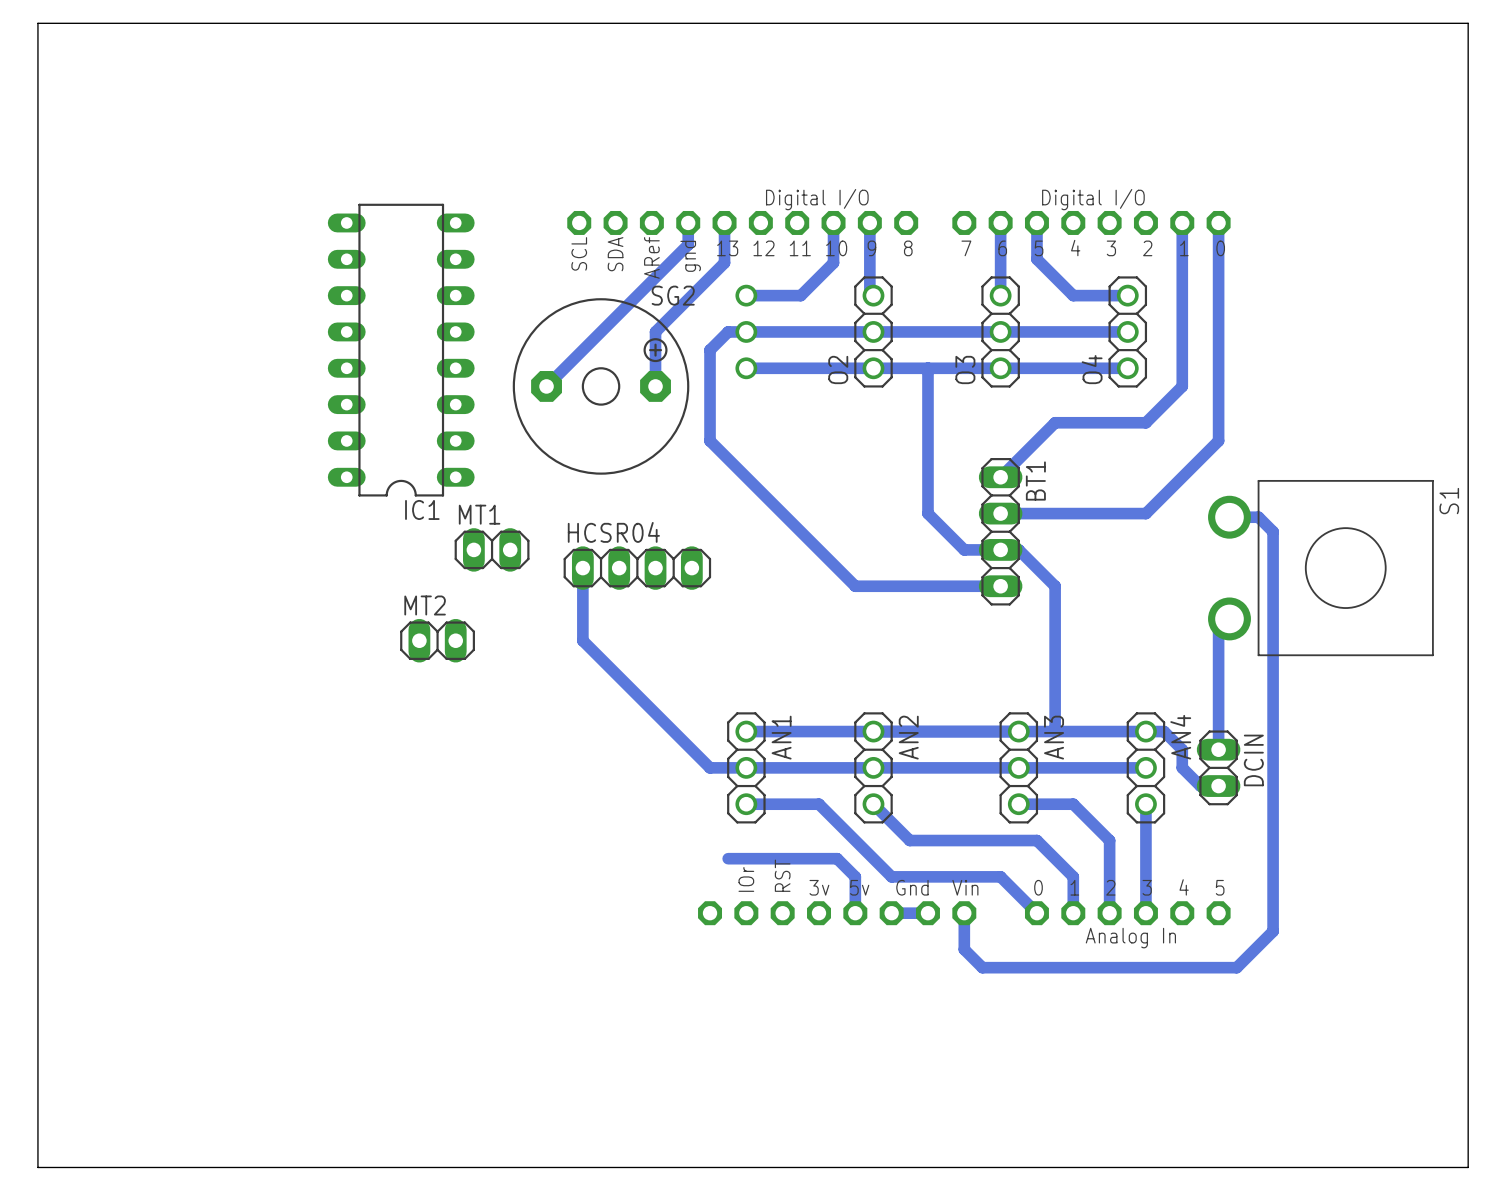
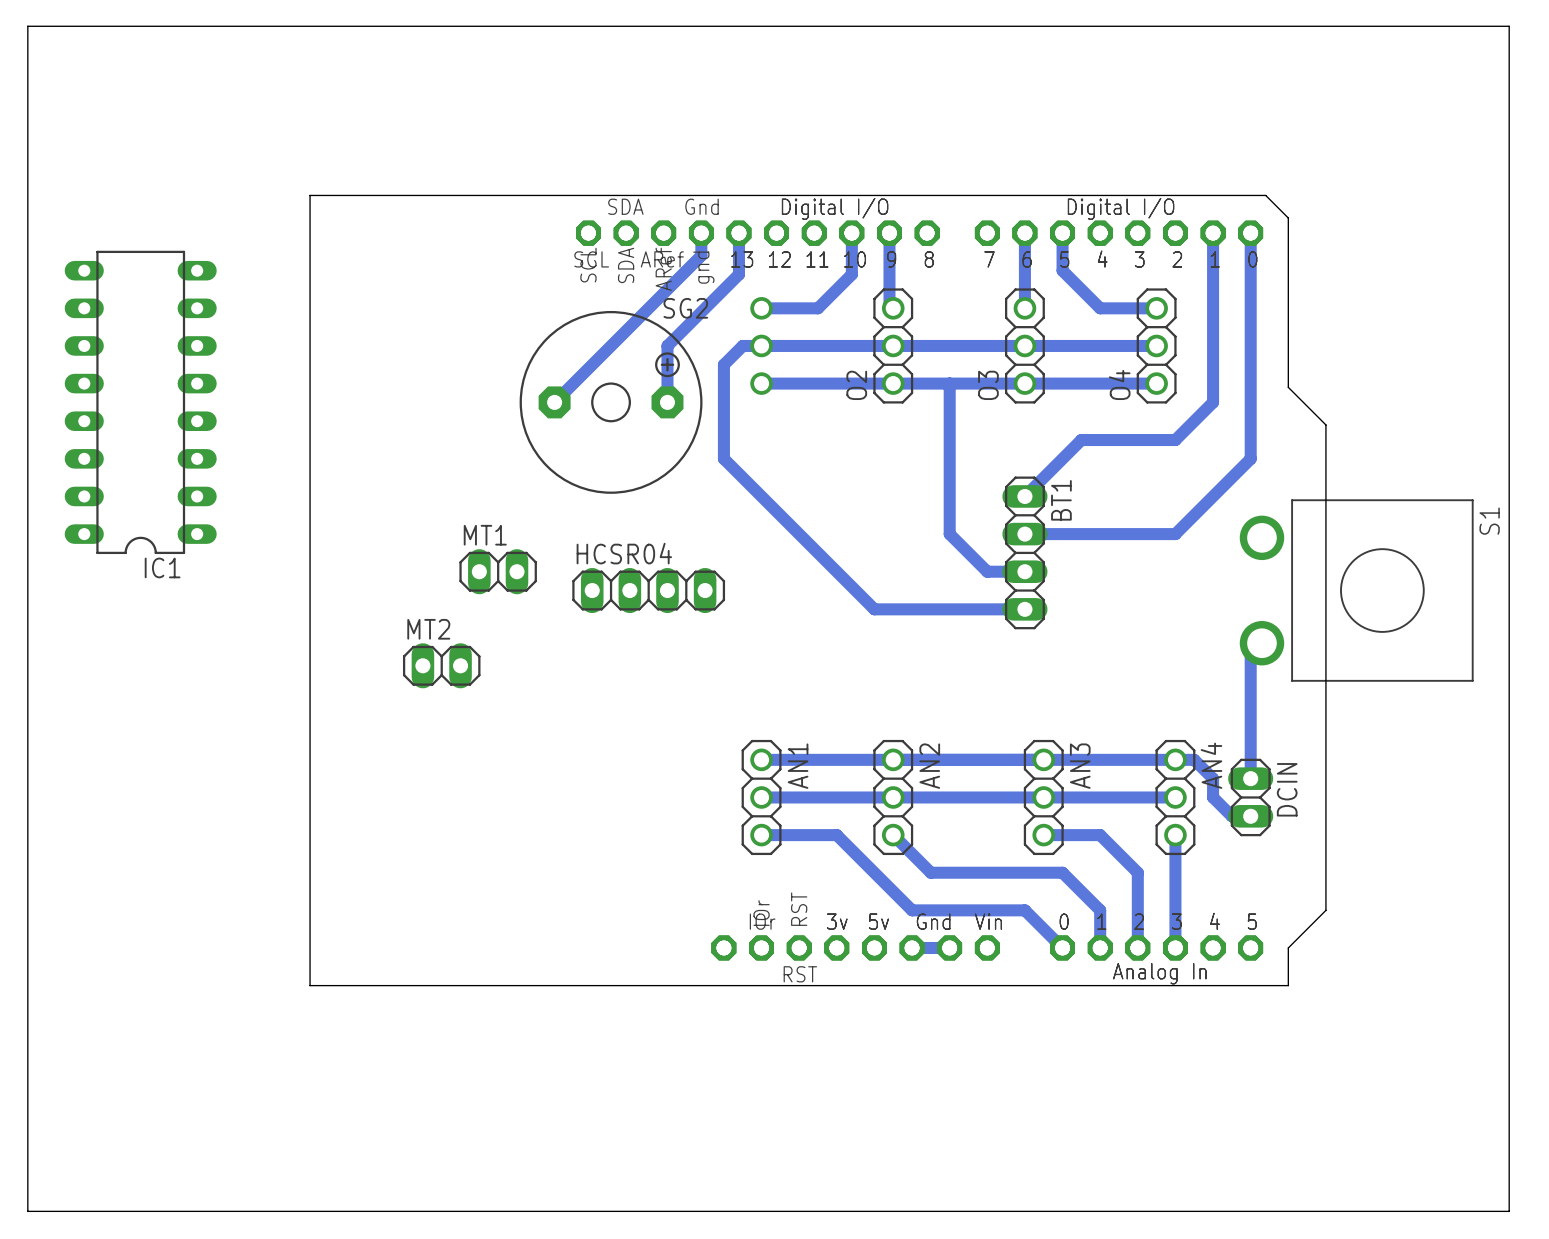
IC1 position: (401, 350) -> (140, 402)
bottom track: (1229, 517) (1258, 517) (1273, 531) (1273, 931) (1236, 967) (982, 967) (964, 949) (964, 913) -> none
bottom track: (1000, 549) (1018, 549) (1055, 586) (1055, 731) -> none
bottom track: (582, 568) (582, 640) (710, 767) (746, 767) -> none
part: none -> (817, 590)
bottom track: (728, 858) (837, 858) (855, 876) (855, 913) -> none

